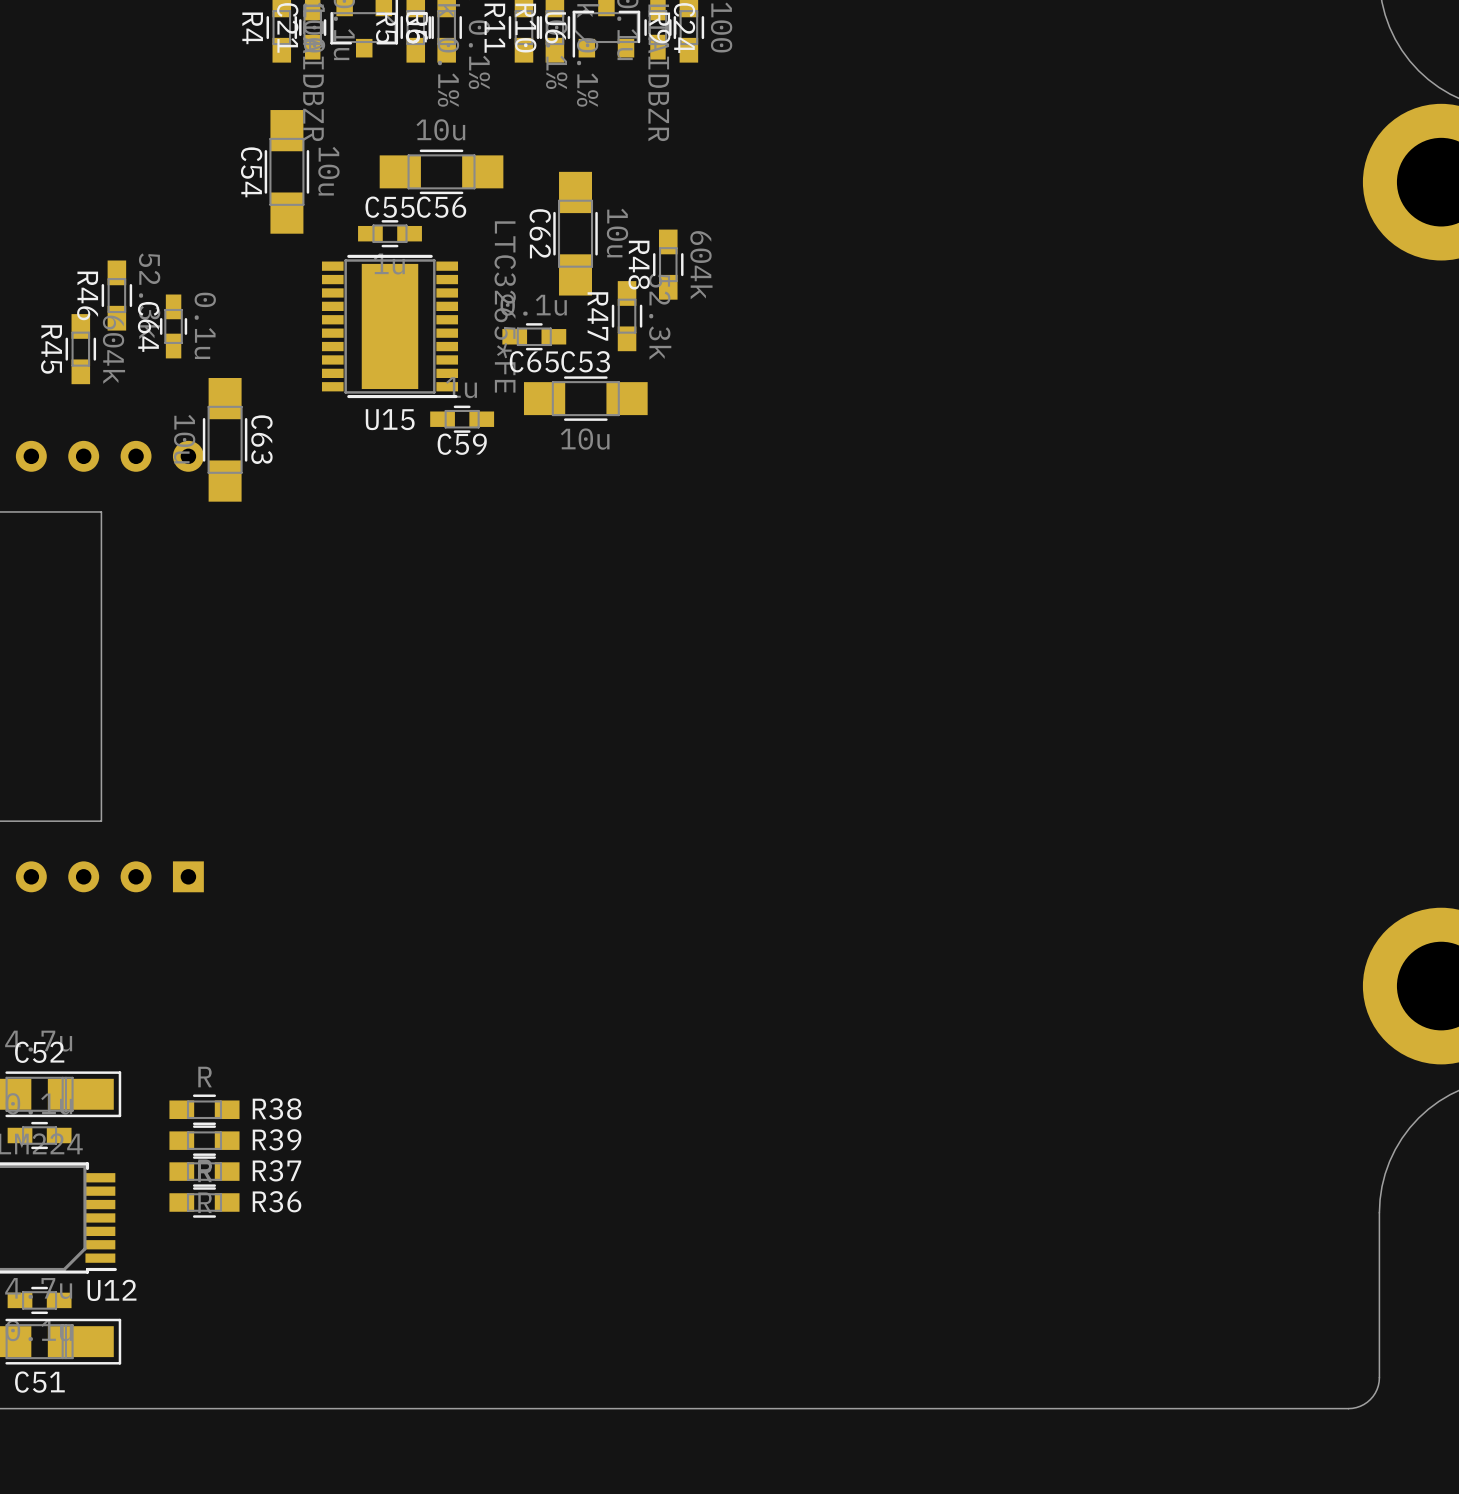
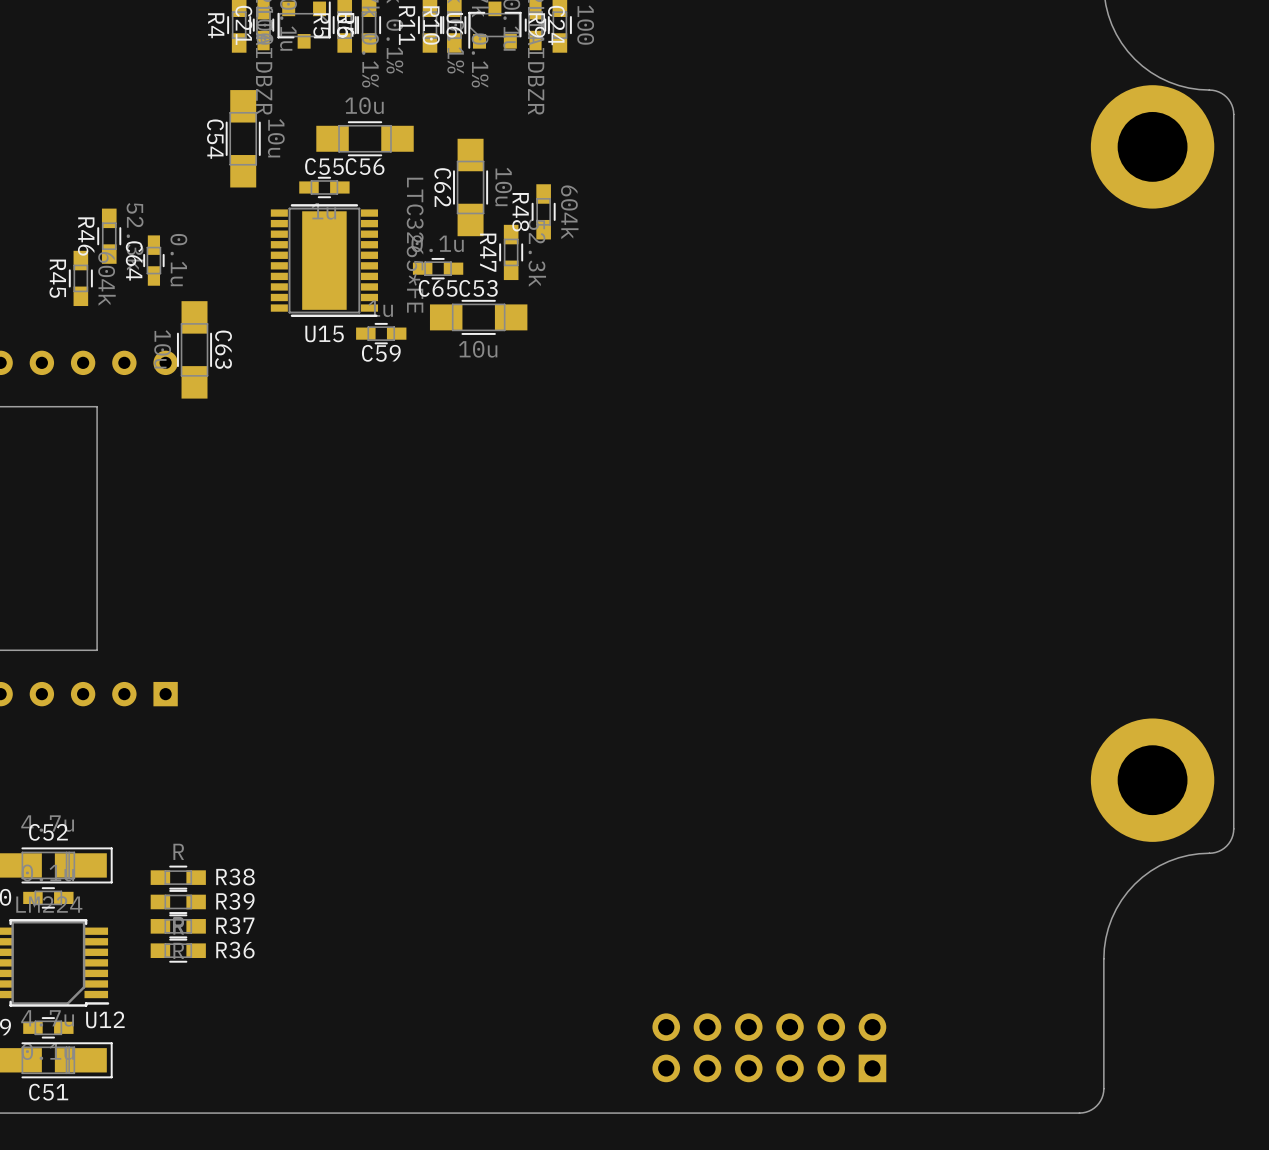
part: none -> (769, 1047)

